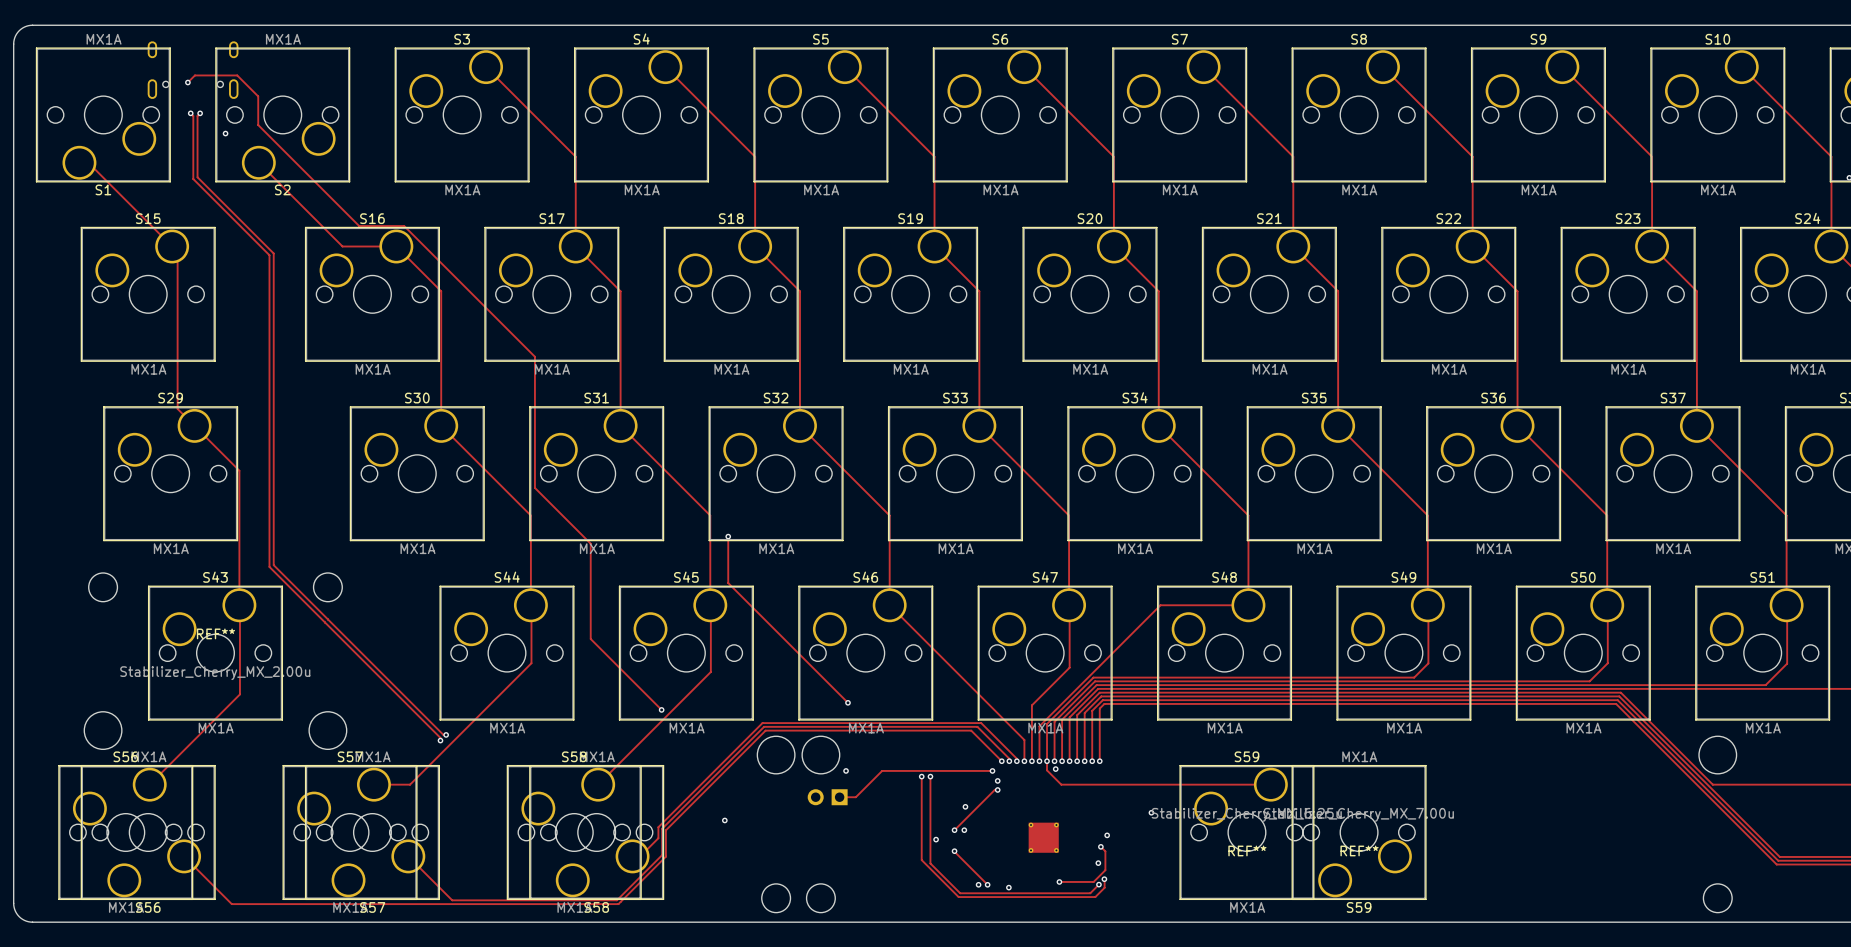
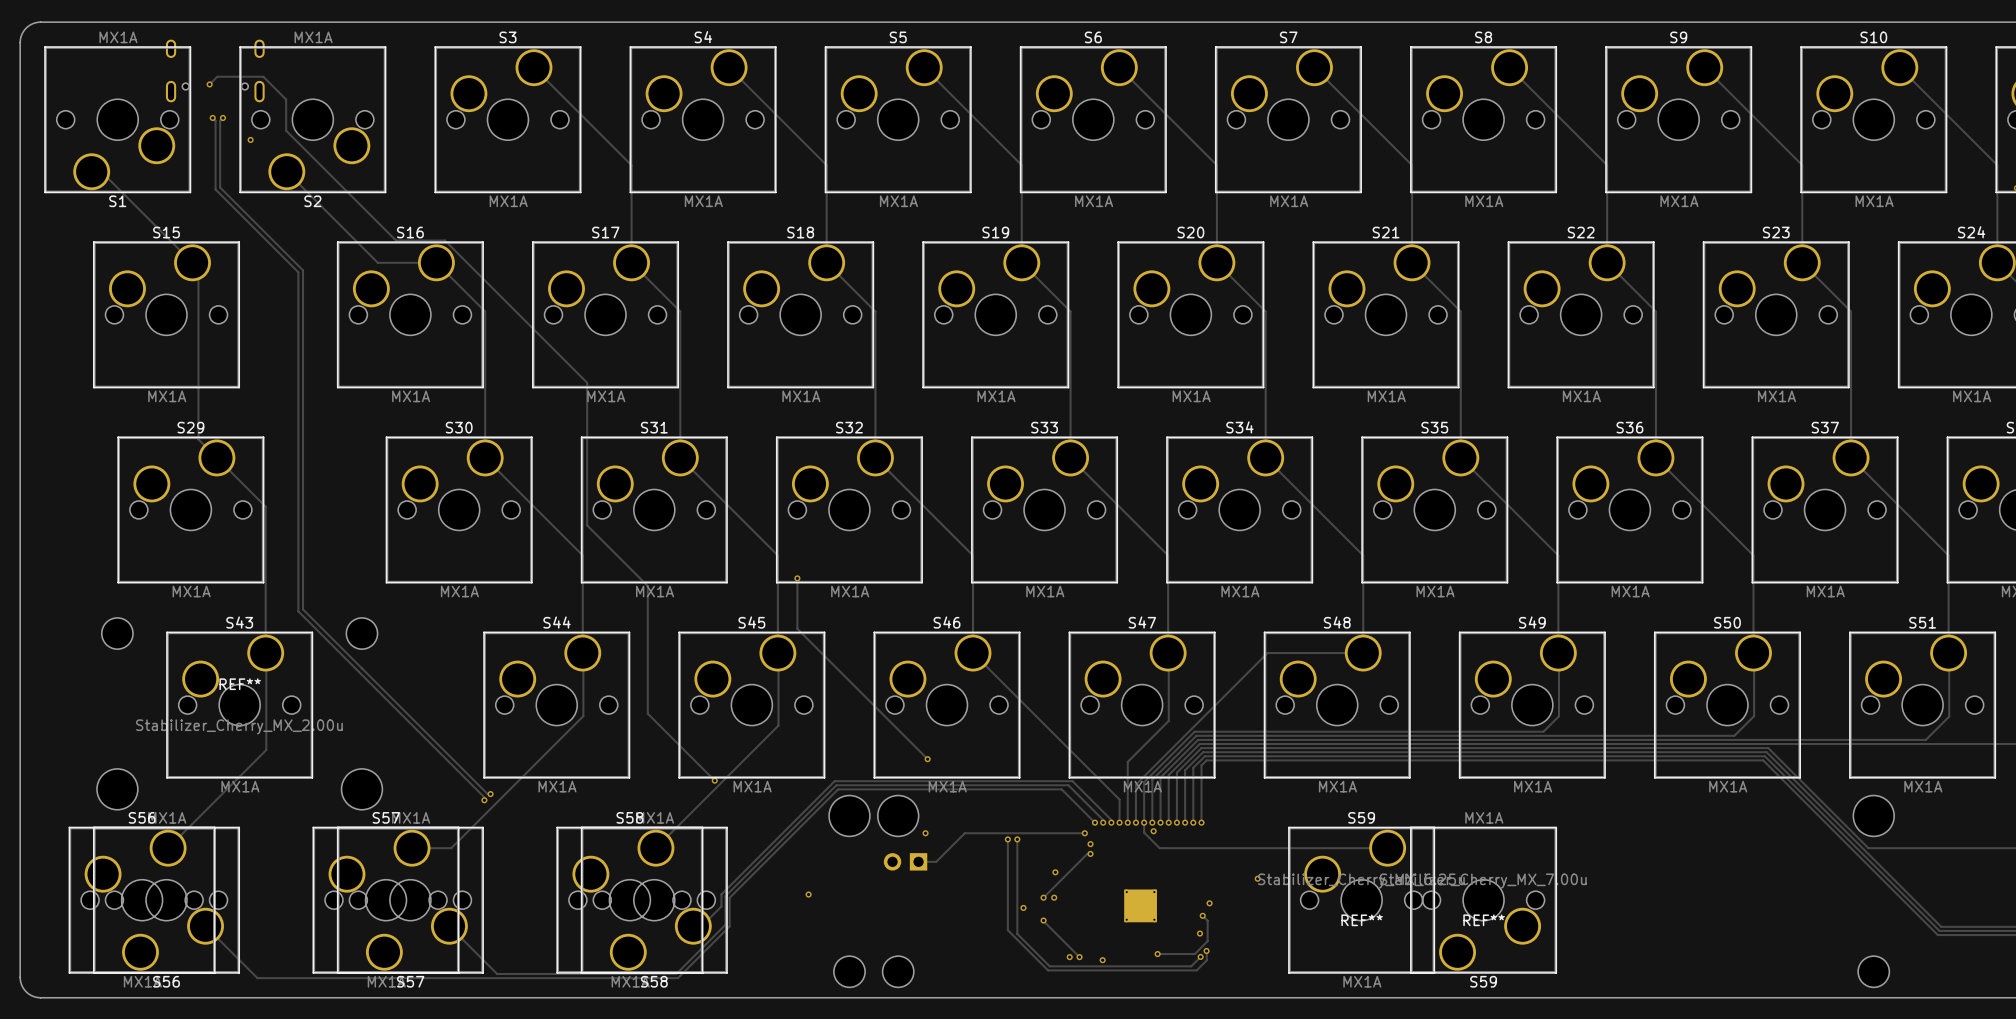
track: (590, 639) (661, 709) -> (647, 689) (647, 713) (714, 780)
via position: (661, 709) -> (714, 780)
via position: (724, 820) -> (808, 894)

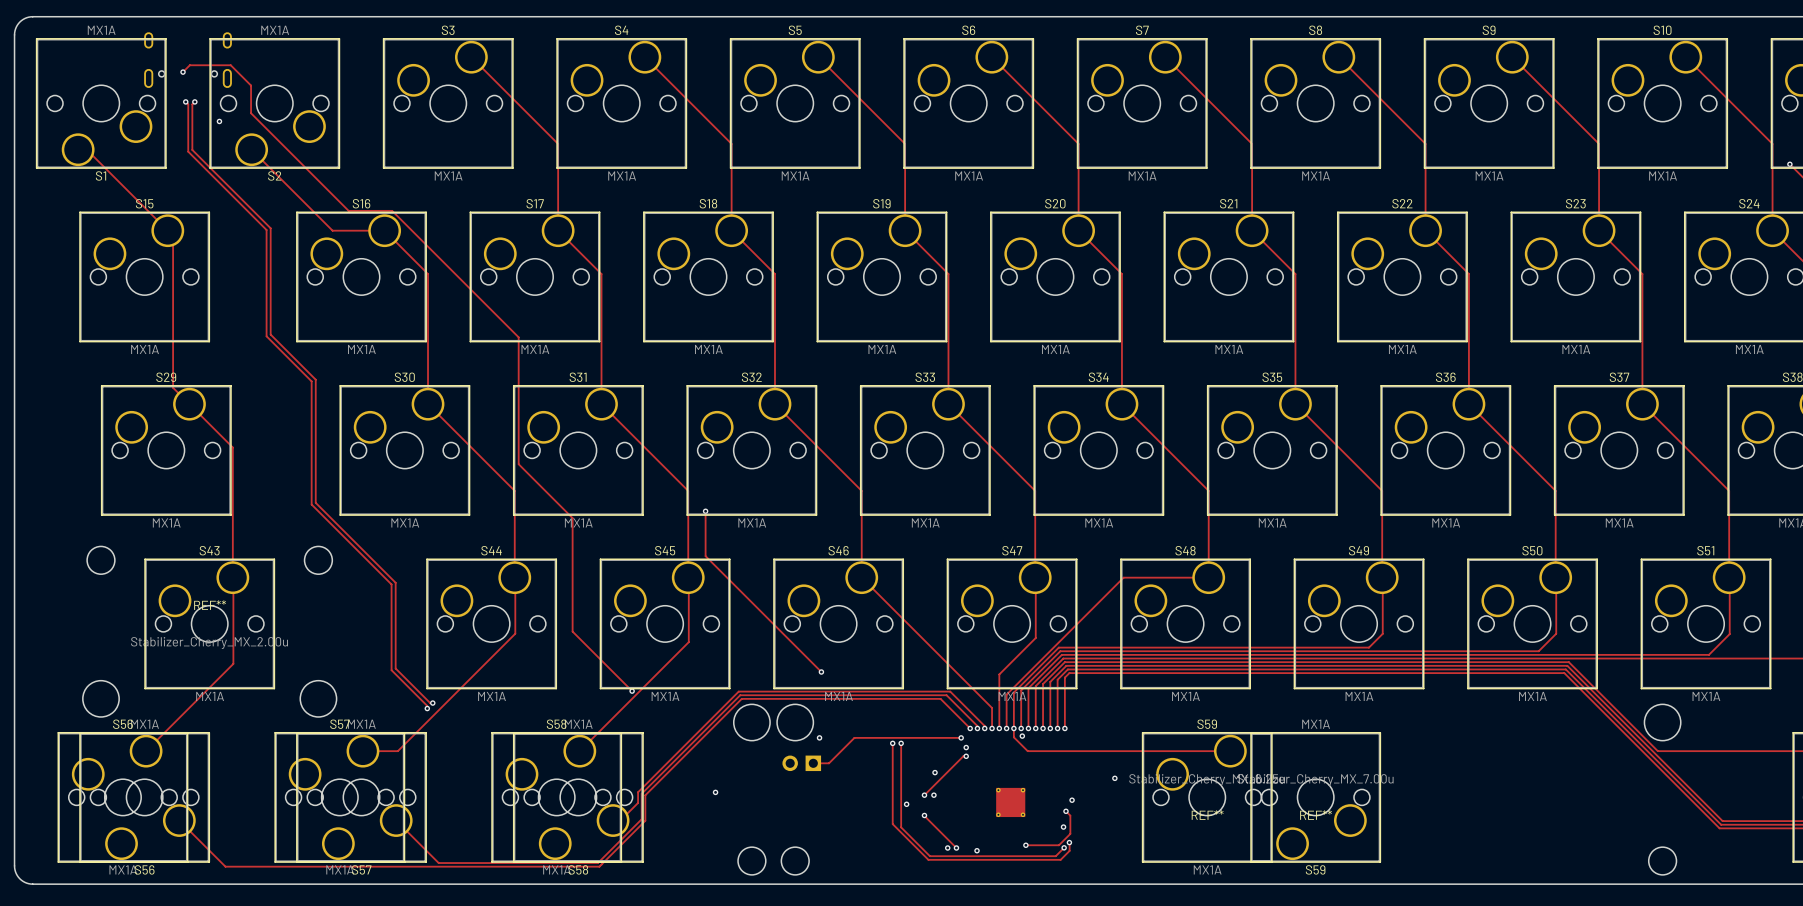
track: (220, 172) (220, 187) (303, 270) (303, 609) (448, 755) -> (192, 149) (270, 228) (270, 334) (315, 379) (315, 502) (395, 582) (395, 668)
track: (215, 173) (215, 189) (298, 272) (298, 611) (444, 757) -> (188, 151) (266, 229) (266, 336) (311, 381) (311, 504) (391, 584) (391, 670)

